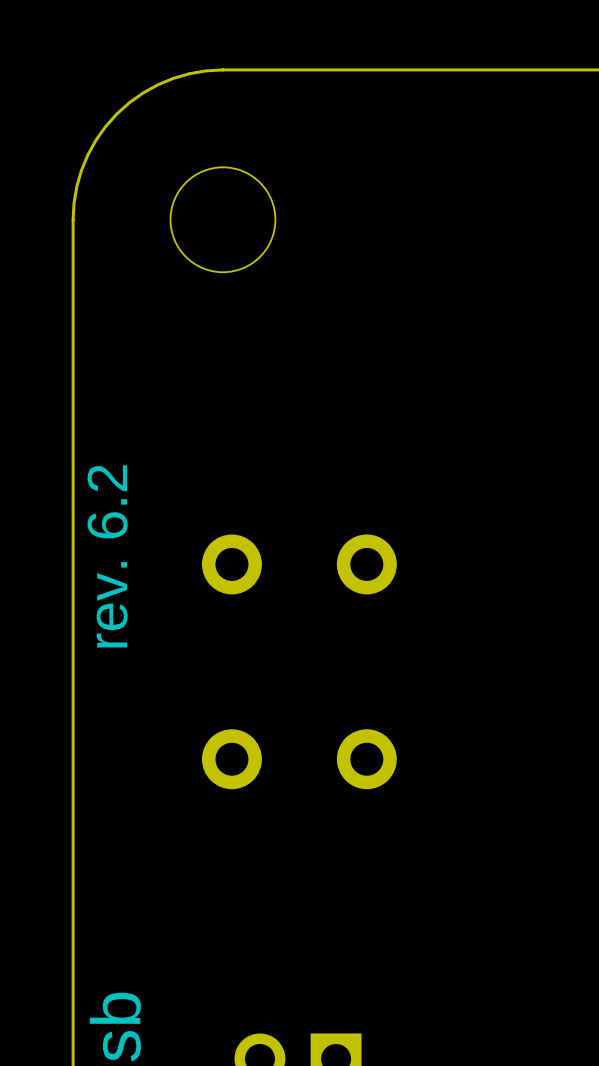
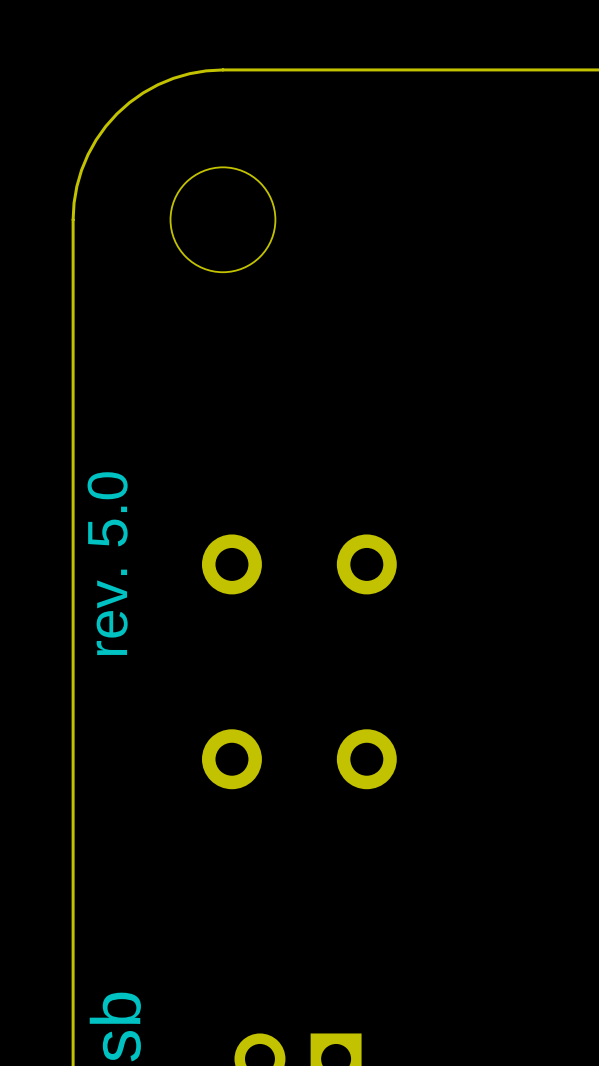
text: rev. 6.2 (107, 556) -> rev. 5.0 (107, 563)

